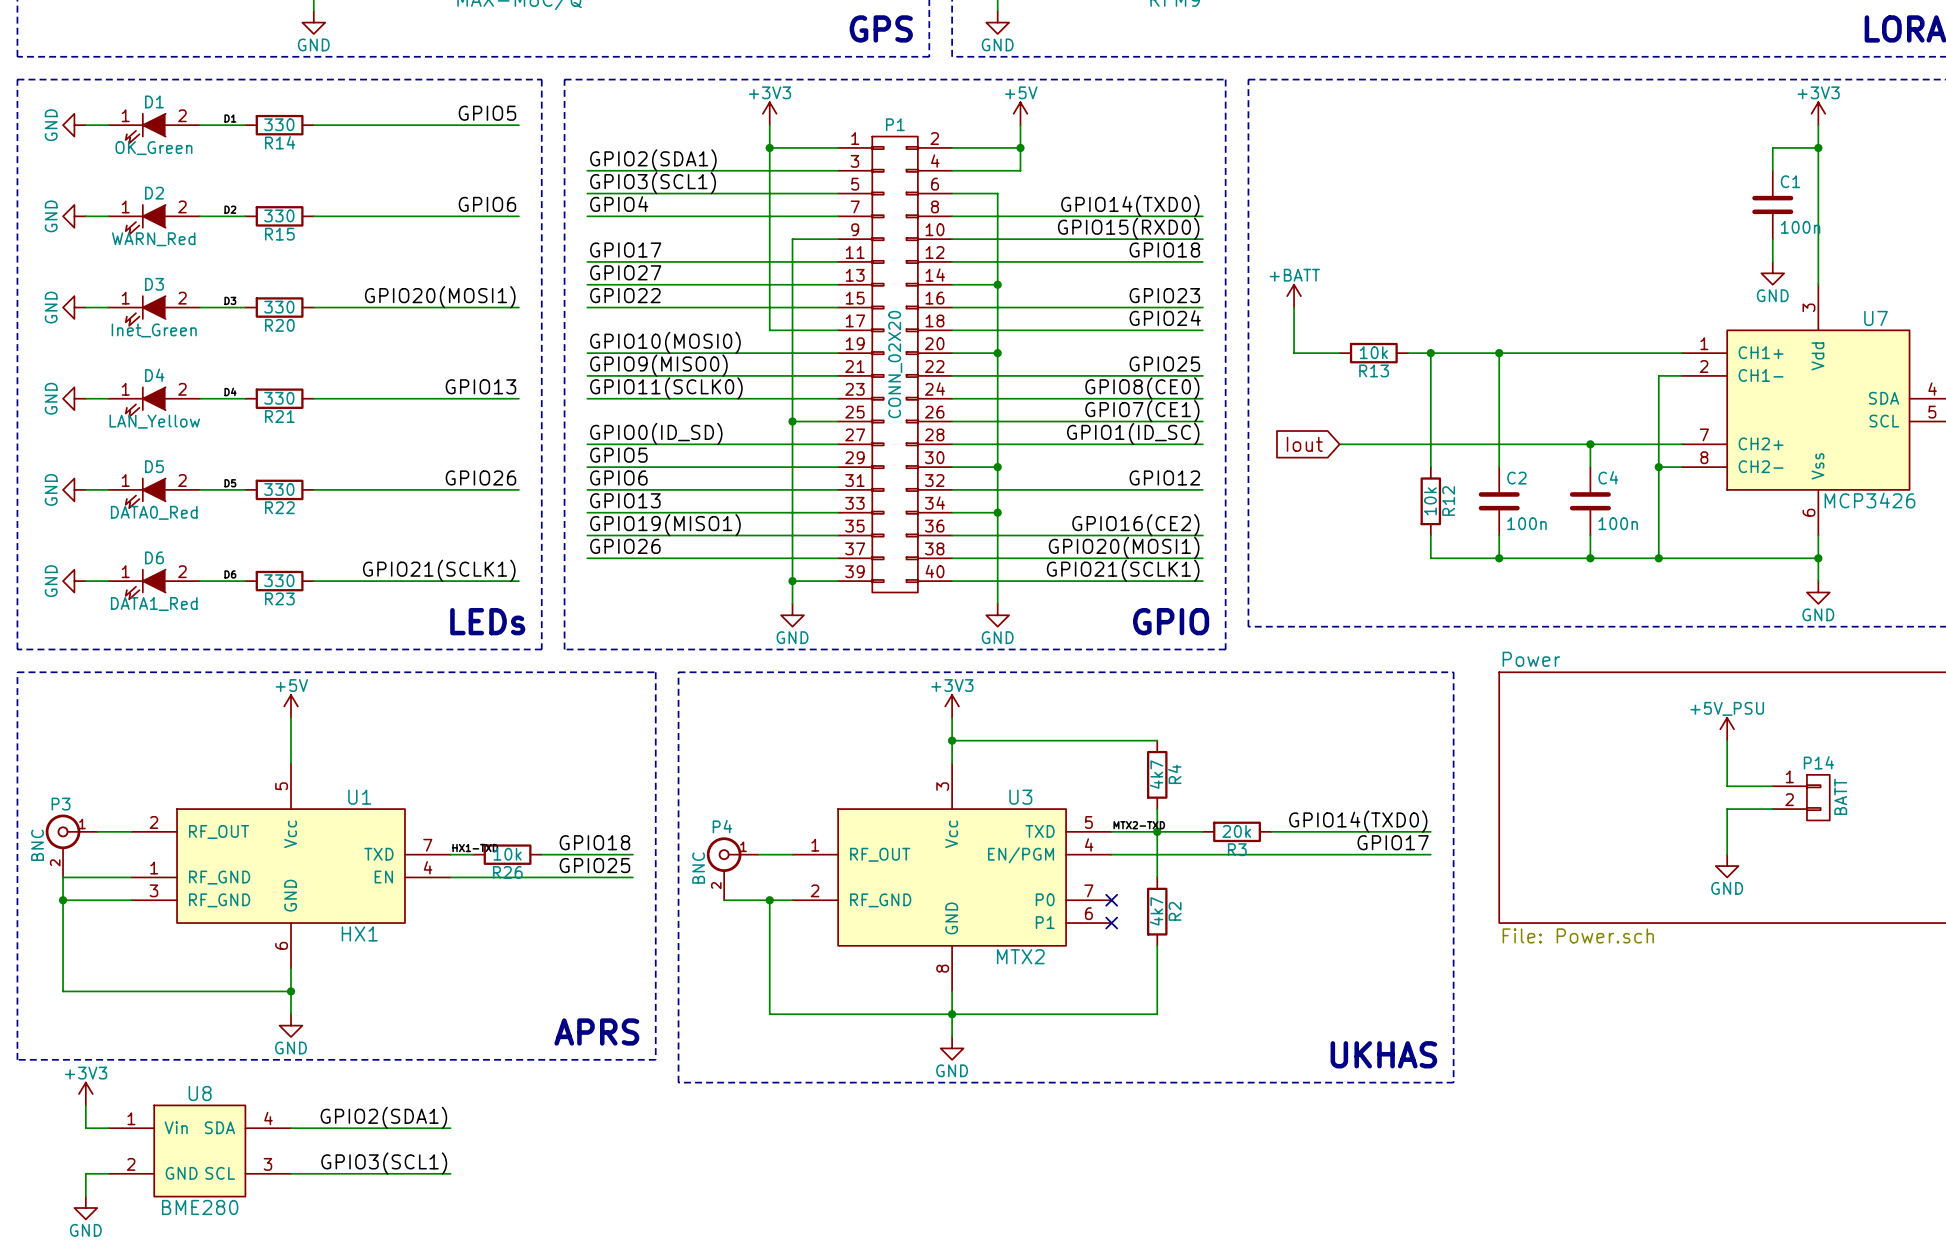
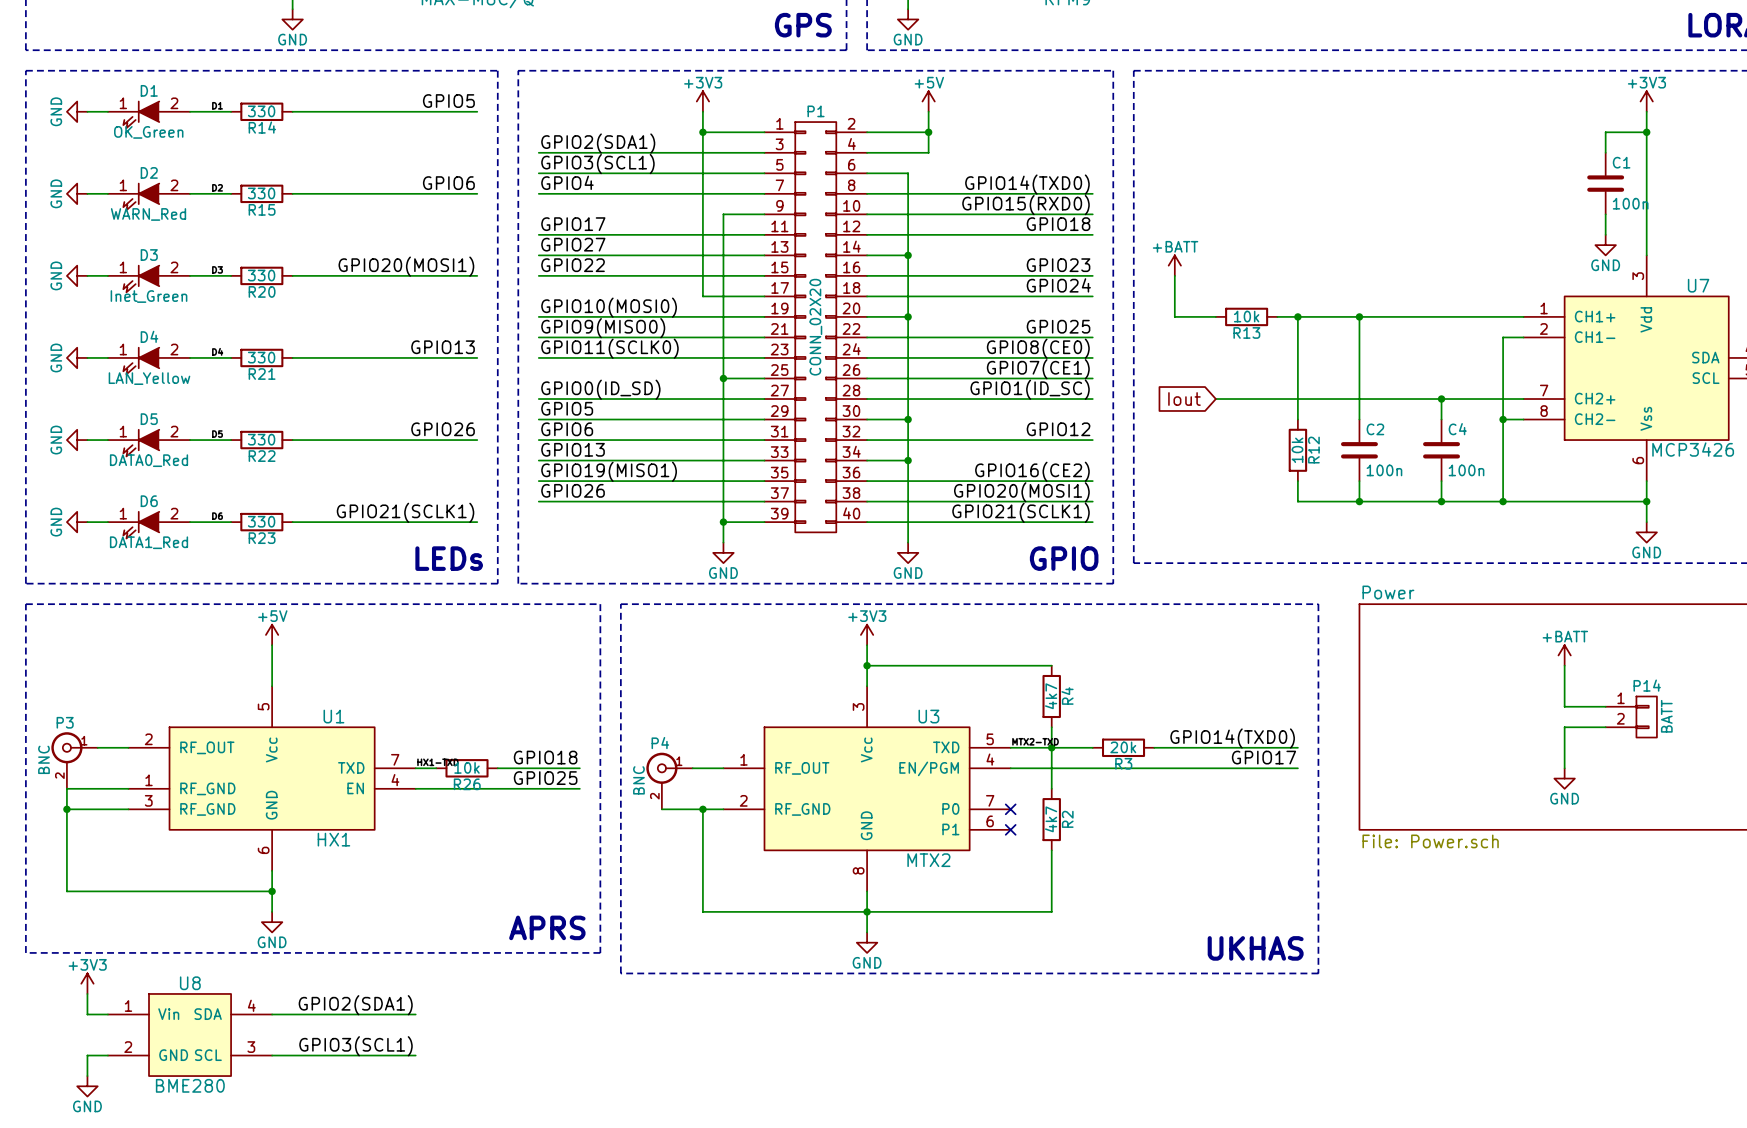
power symbol: +5V_PSU (1727, 729) -> +BATT (1564, 655)

